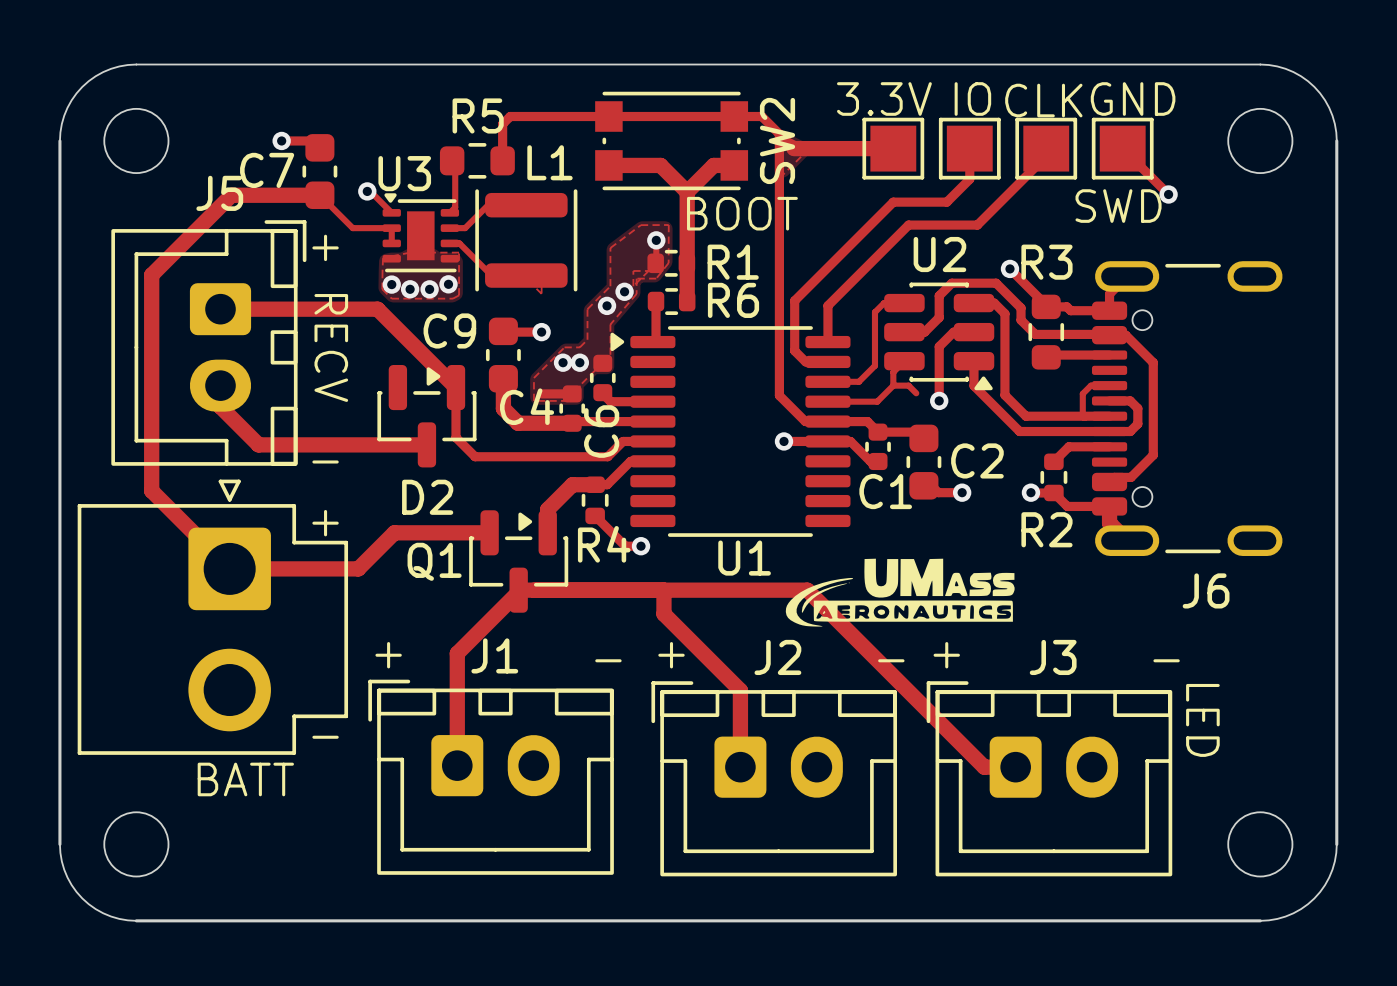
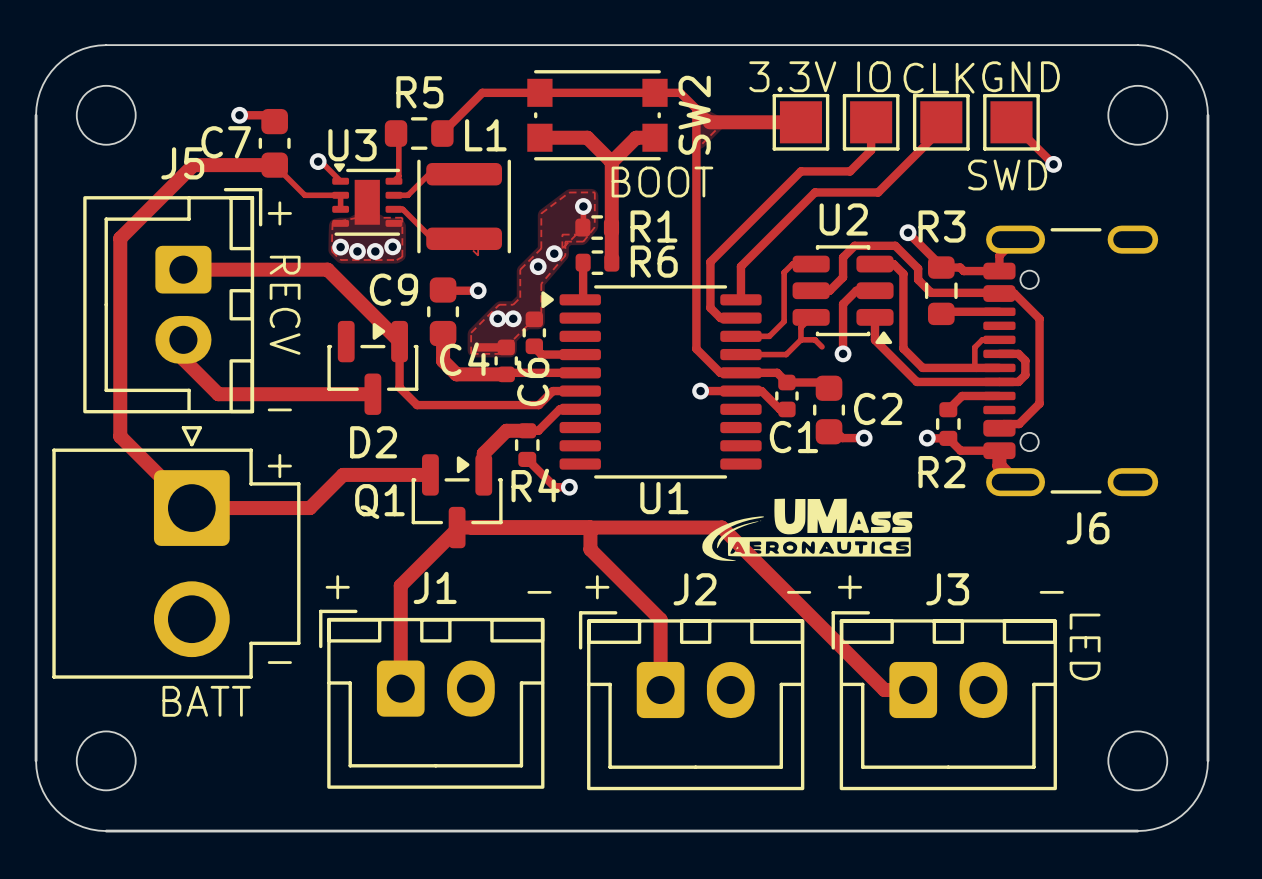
track: (546, 116) (510, 116) (502, 124) (502, 160) -> (482, 92) (442, 132)

